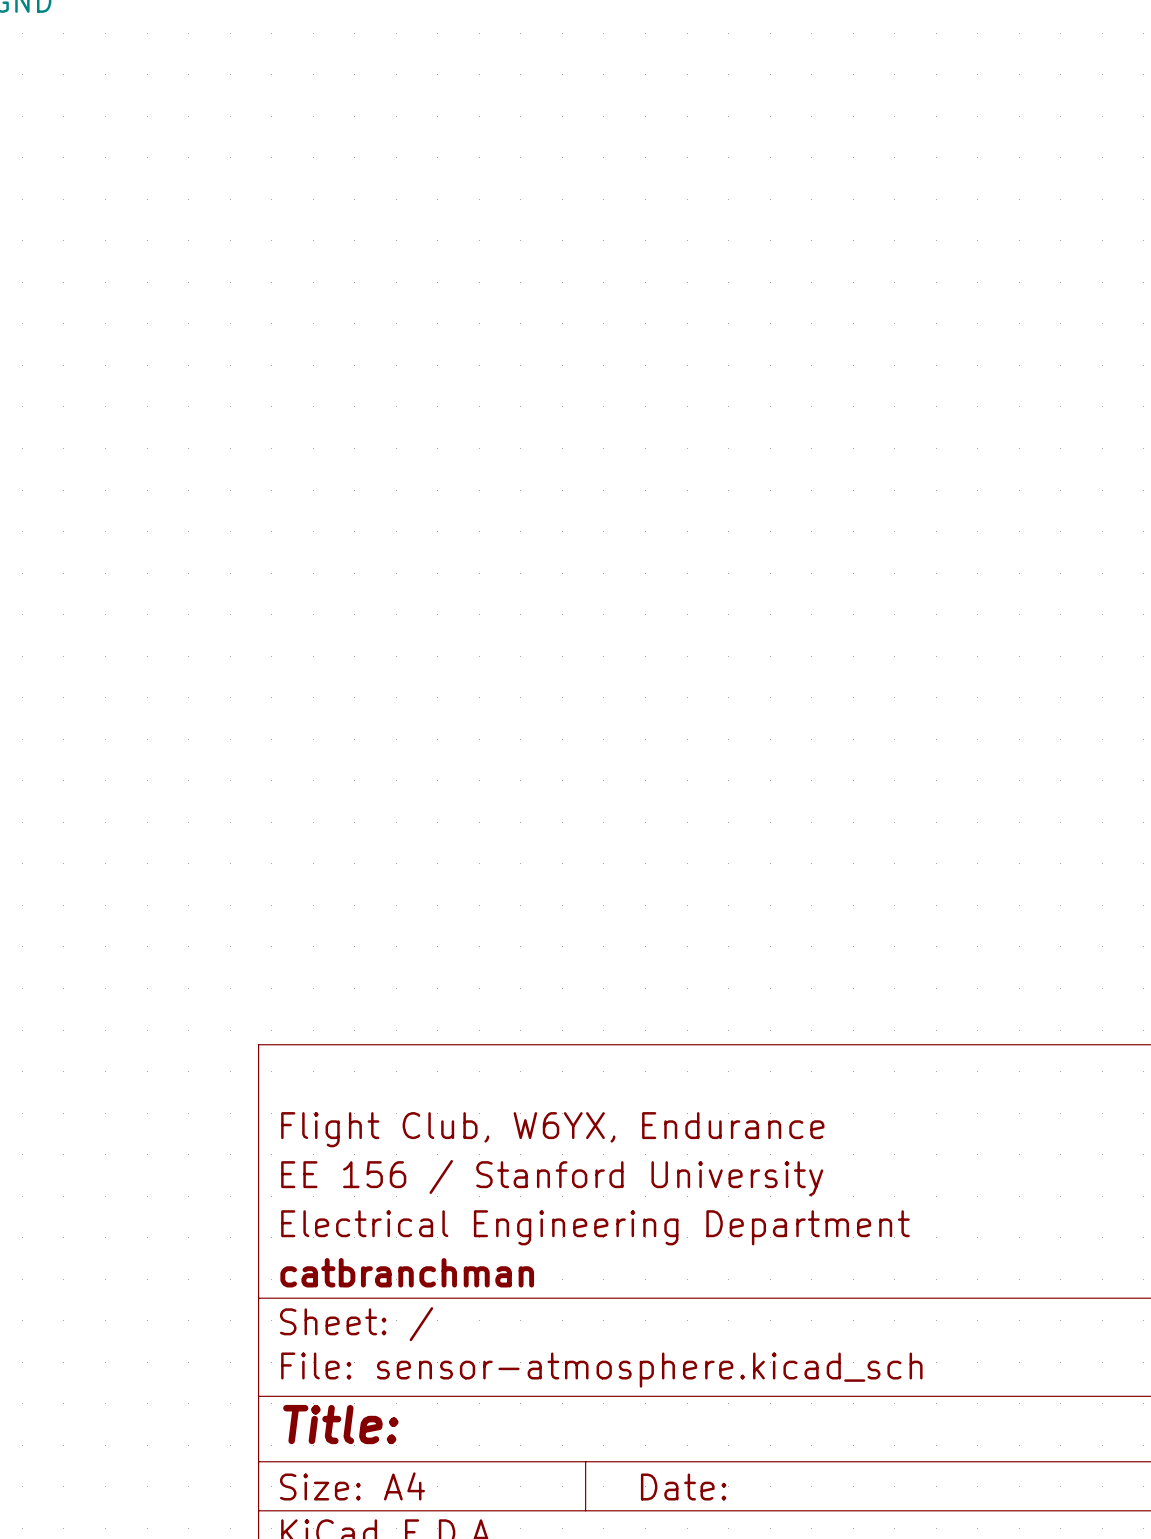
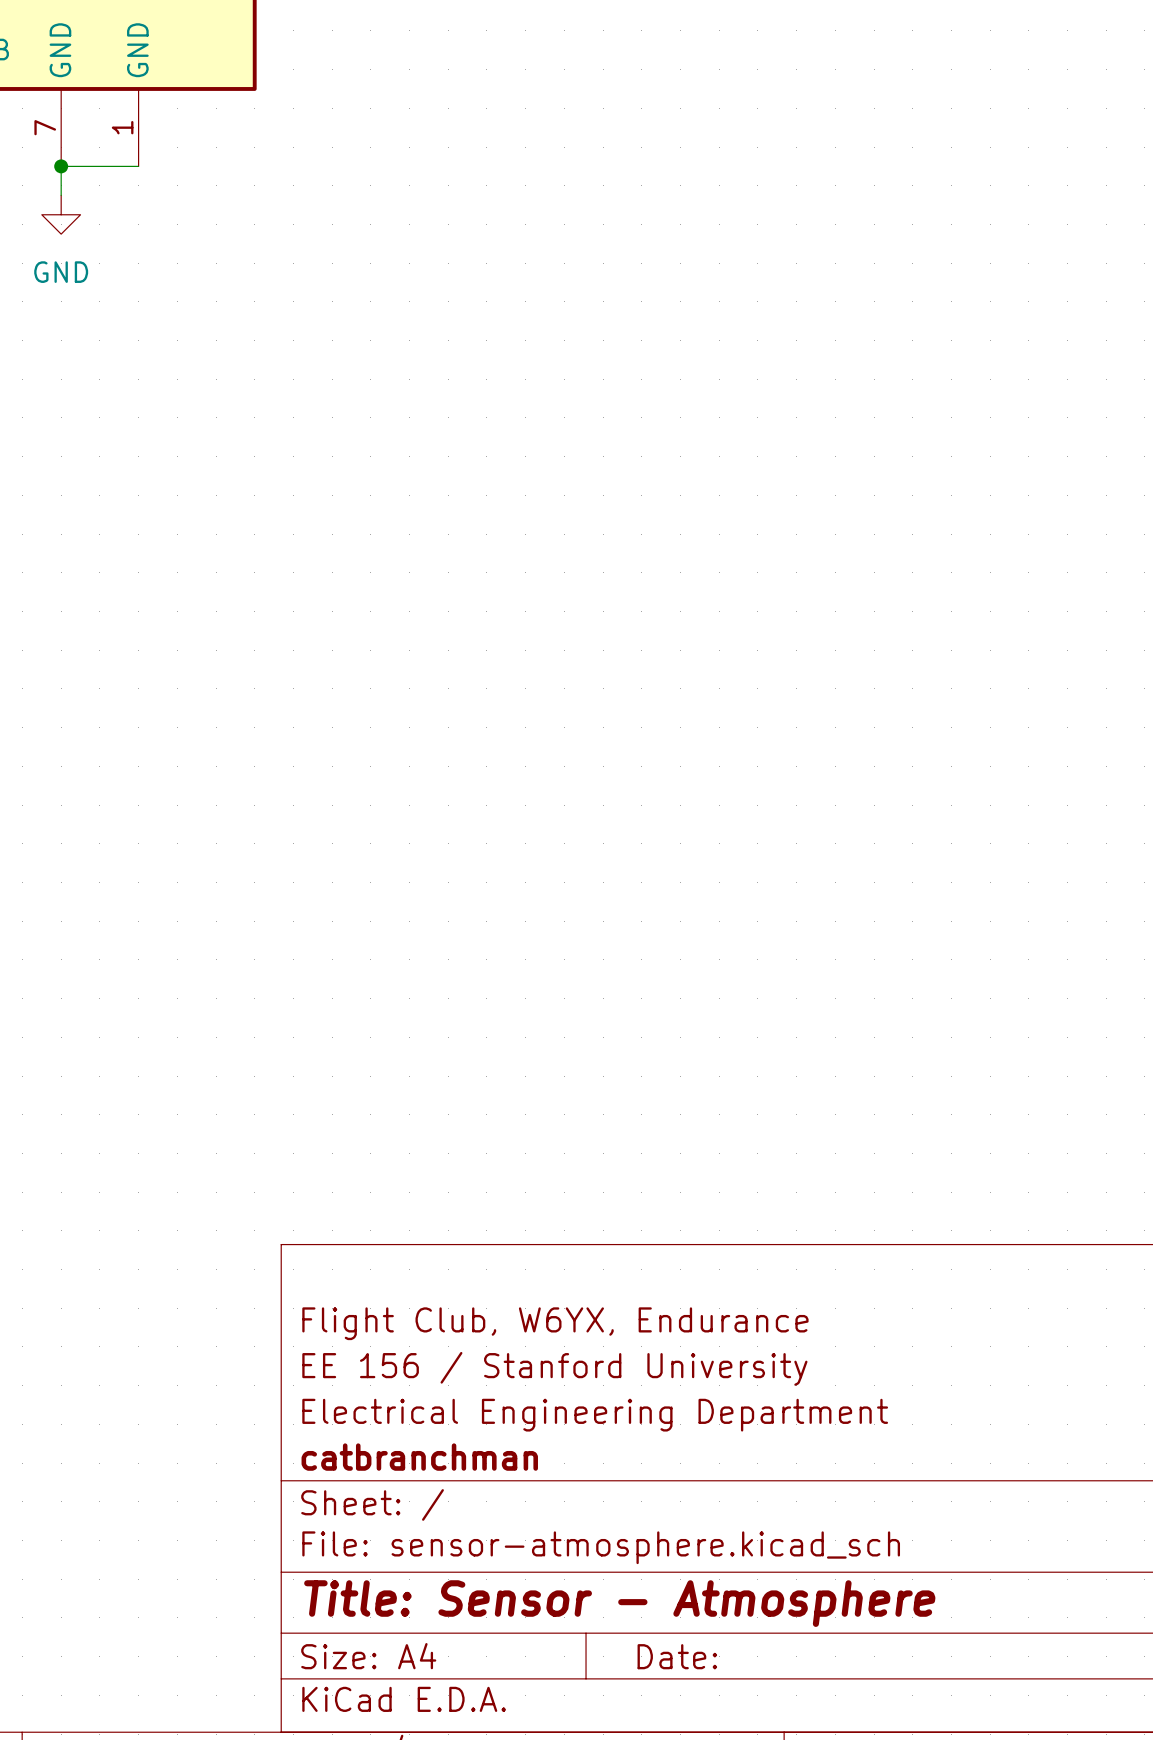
title block: Title: (340, 1424) -> Title: Sensor - Atmosphere (619, 1603)

